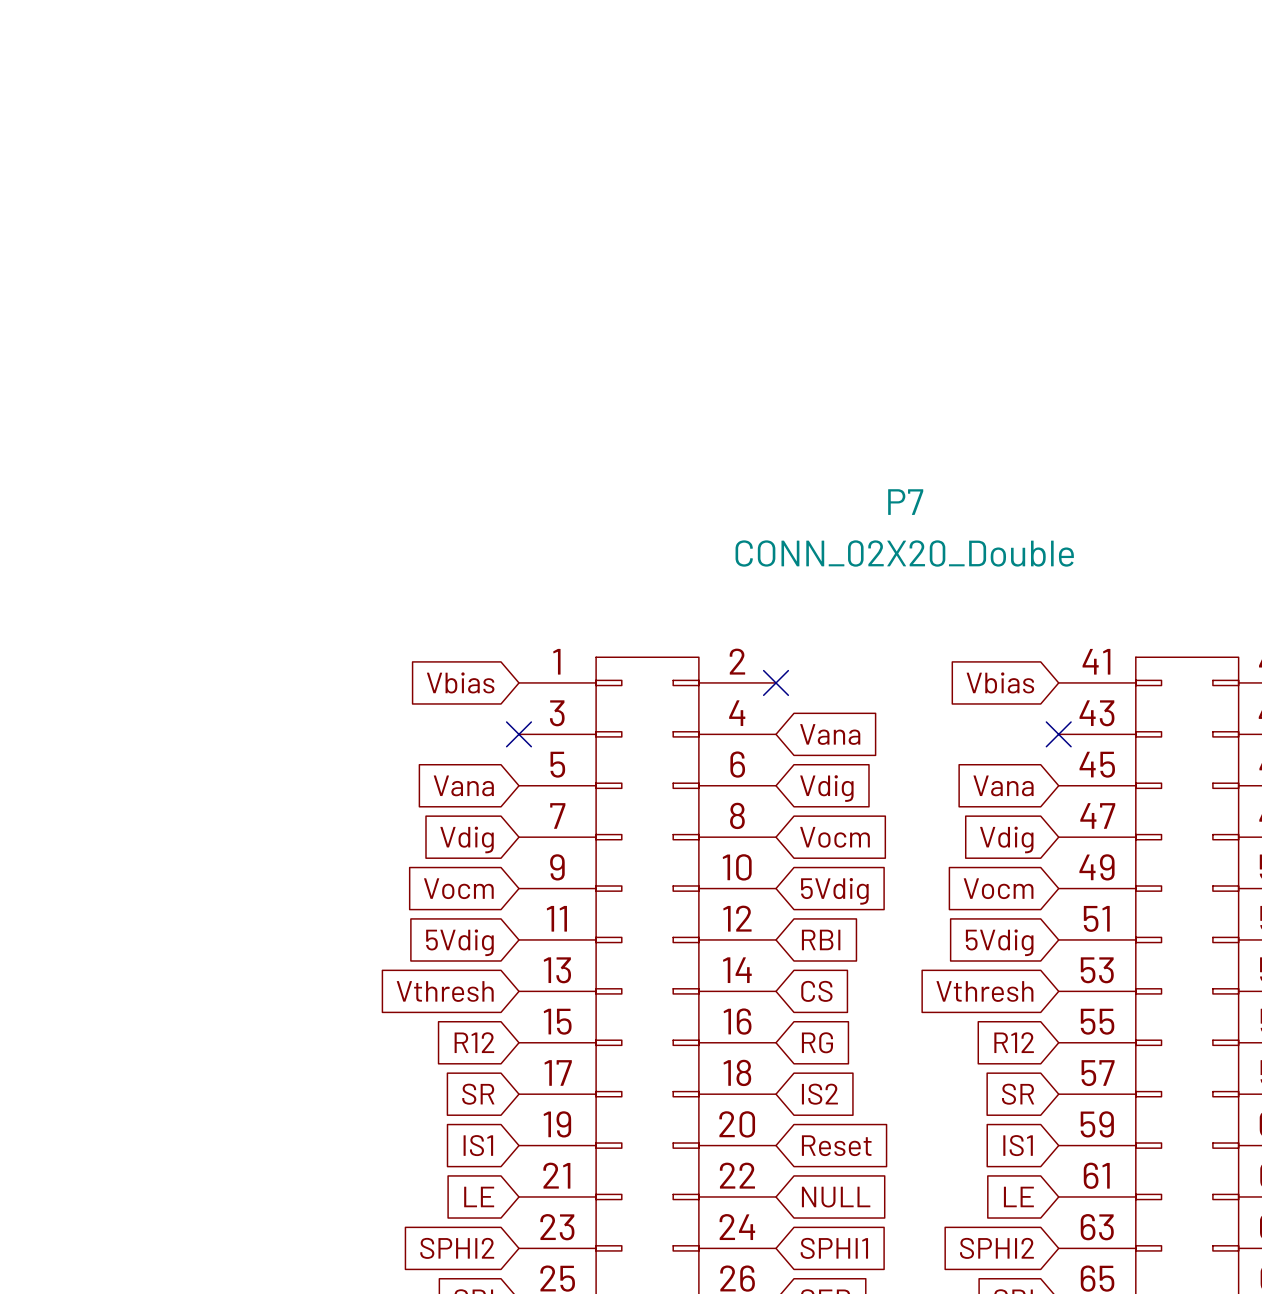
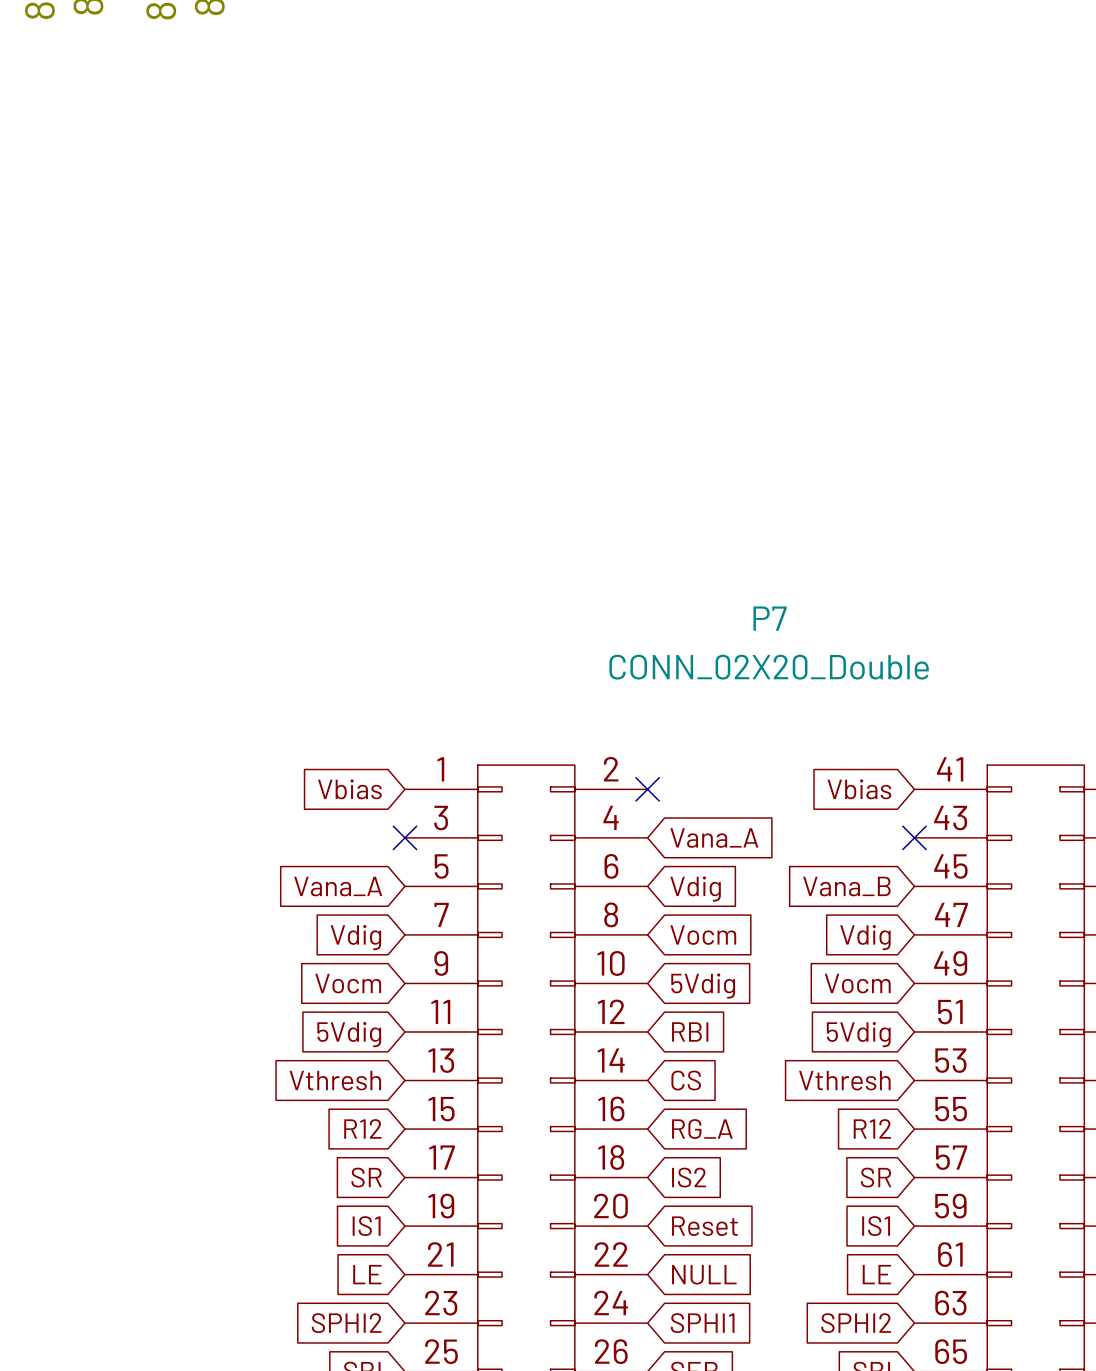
global label: Vana (830, 734) -> Vana_A (714, 838)
global label: Vana (463, 785) -> Vana_A (338, 886)
global label: Vana (1003, 785) -> Vana_B (846, 886)
global label: RG (817, 1042) -> RG_A (702, 1129)

